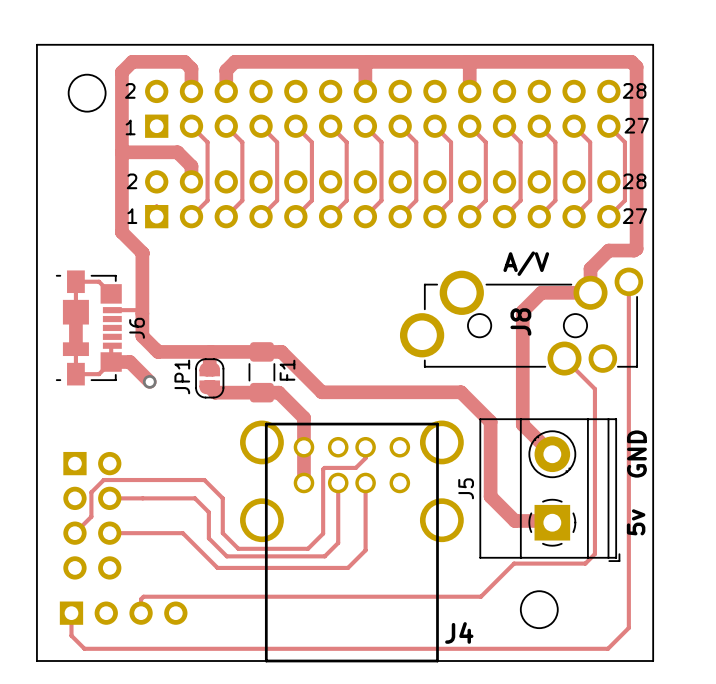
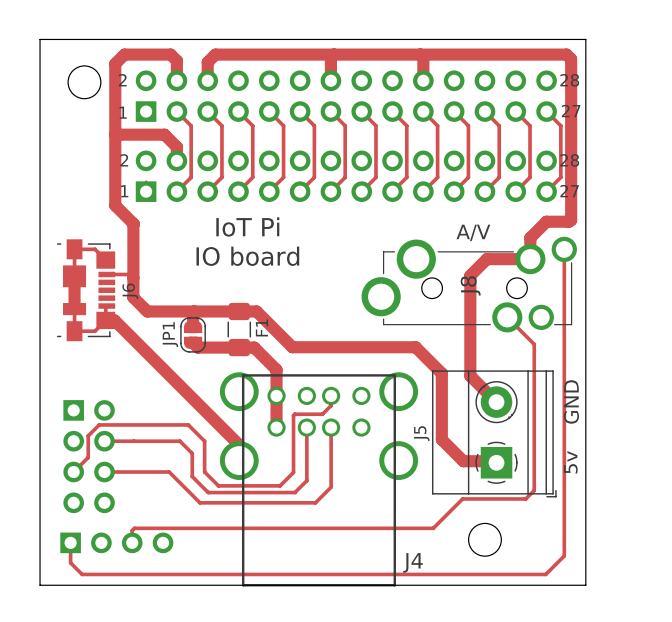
text: none -> IoT Pi (247, 226)
text: none -> IO board (247, 256)
track: (121, 362) (129, 362) (149, 381) -> (114, 320) (239, 445) (239, 460)
via: (149, 381) -> none

